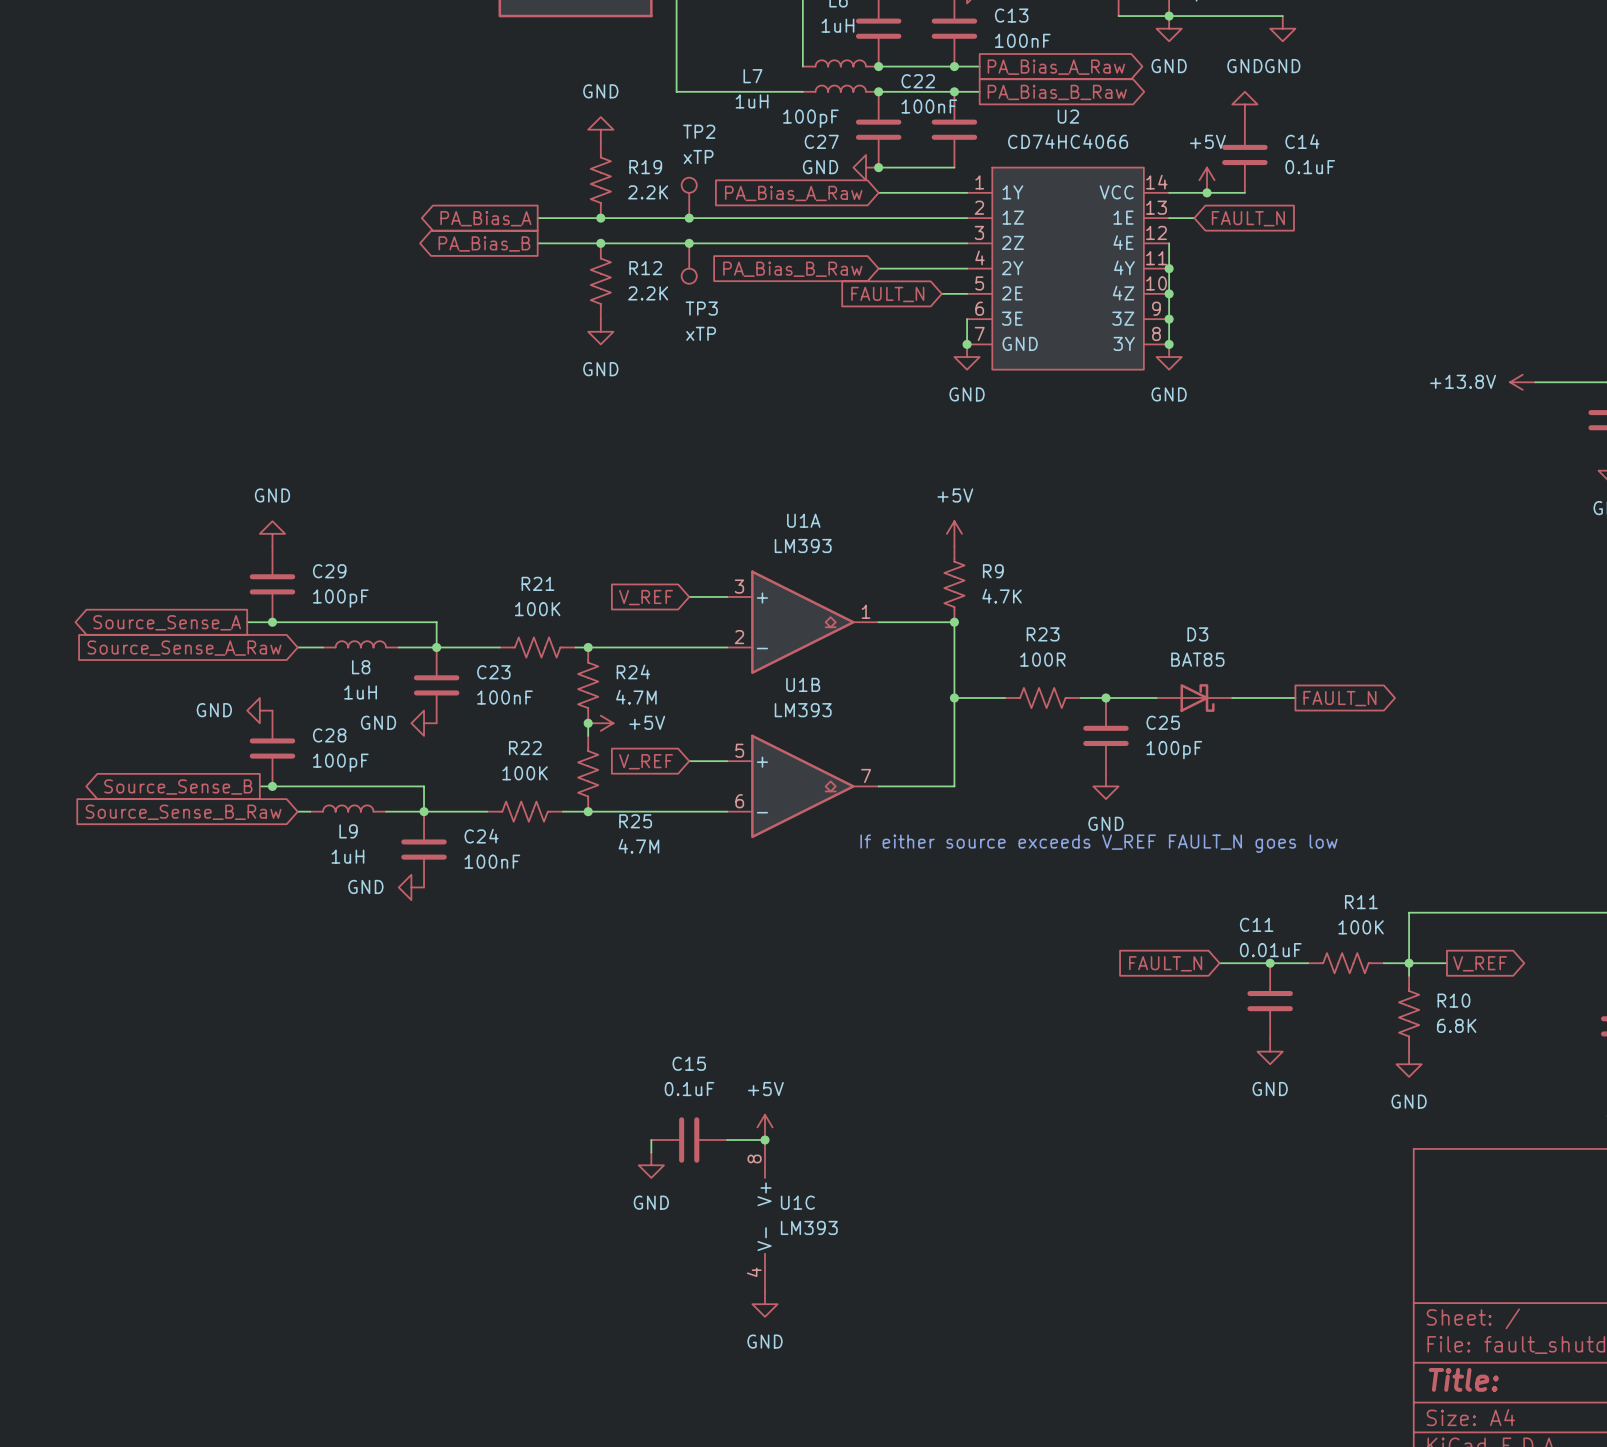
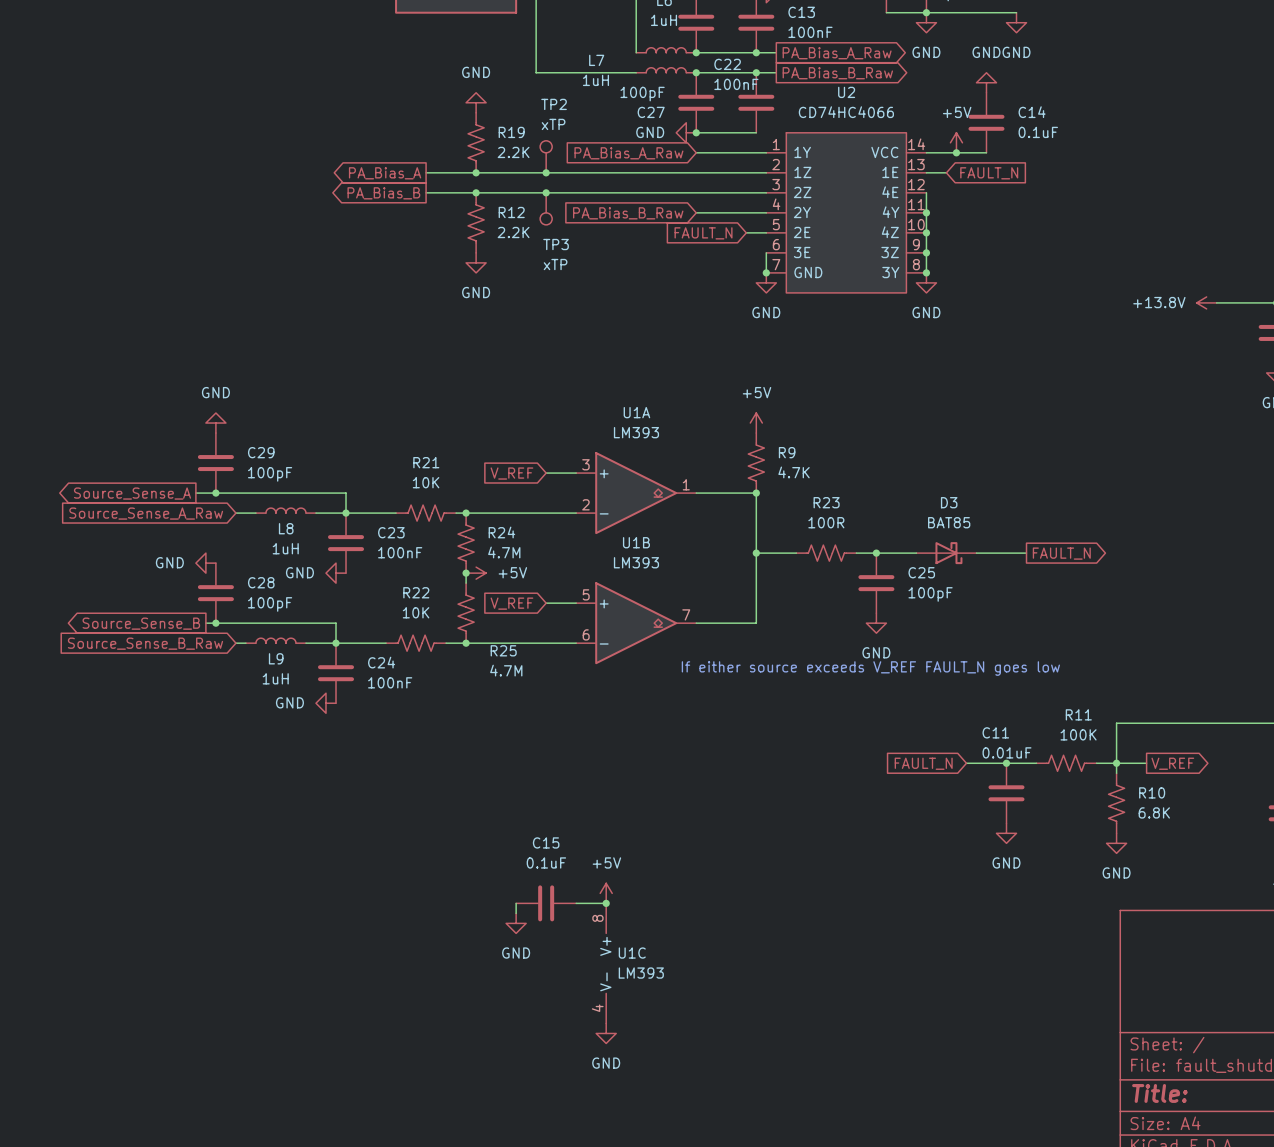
R21 value: 100K (537, 609) -> 10K (426, 482)
R22 value: 100K (525, 773) -> 10K (416, 612)

